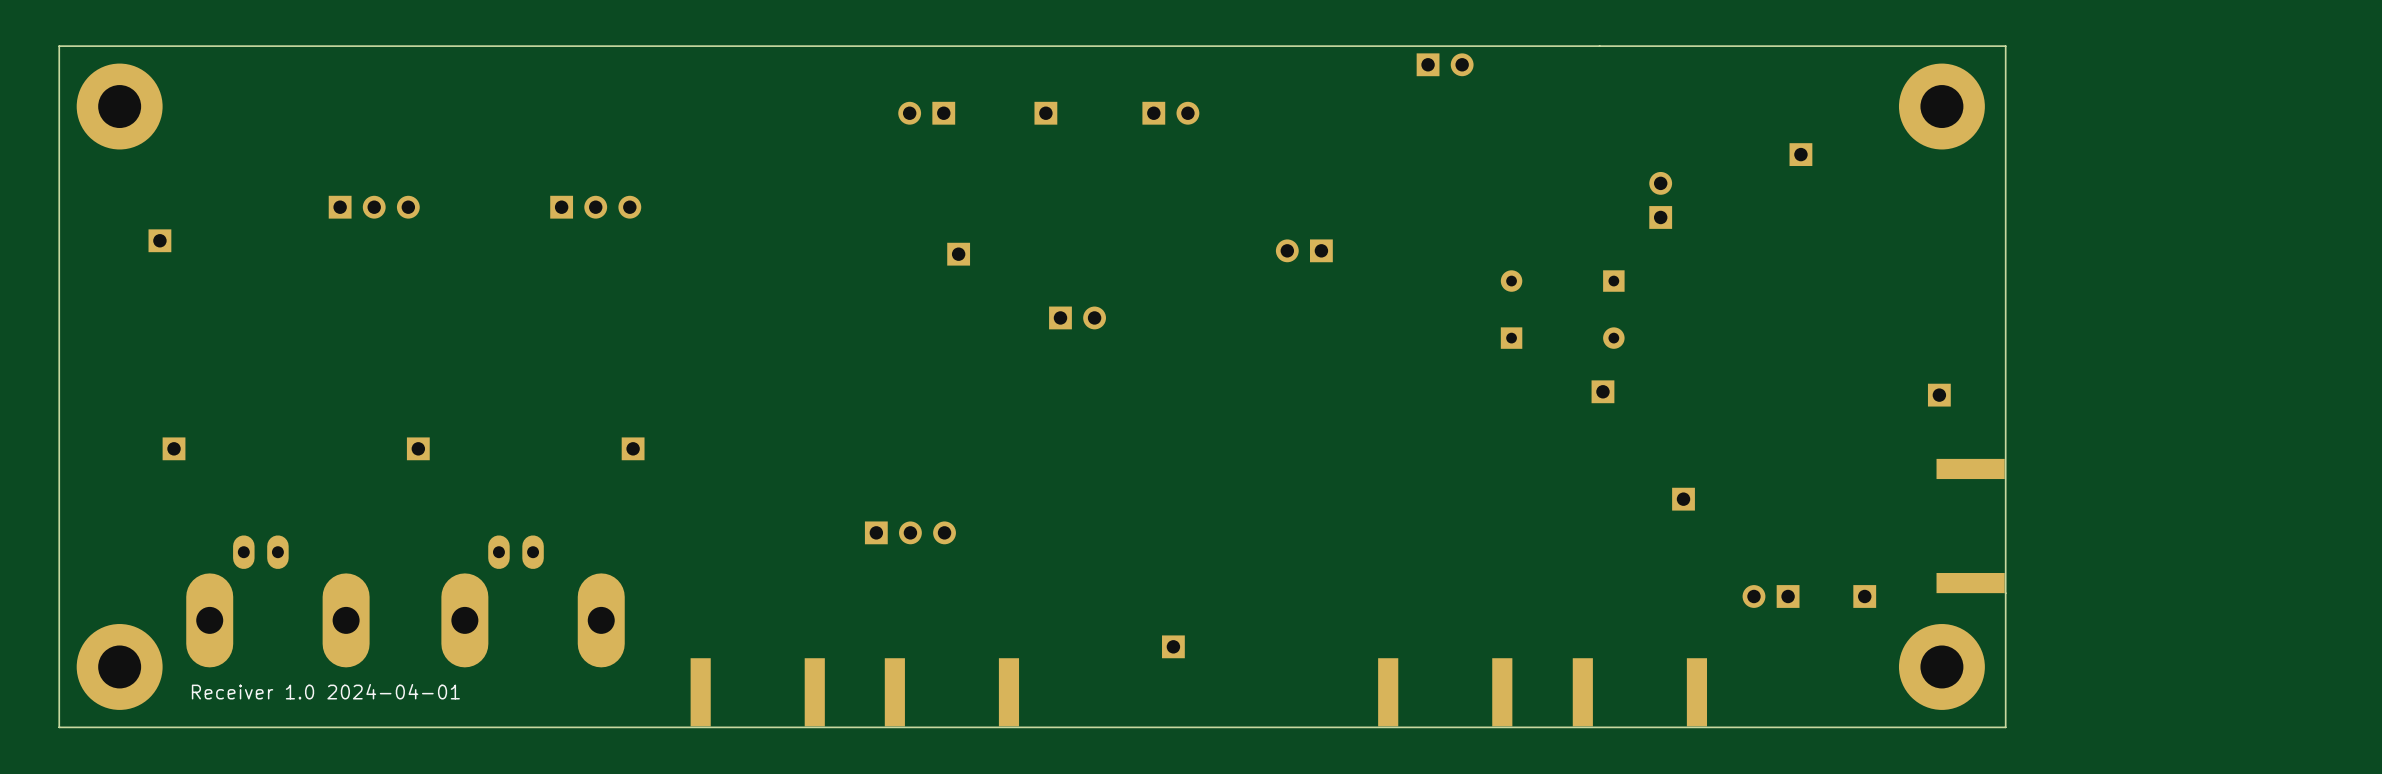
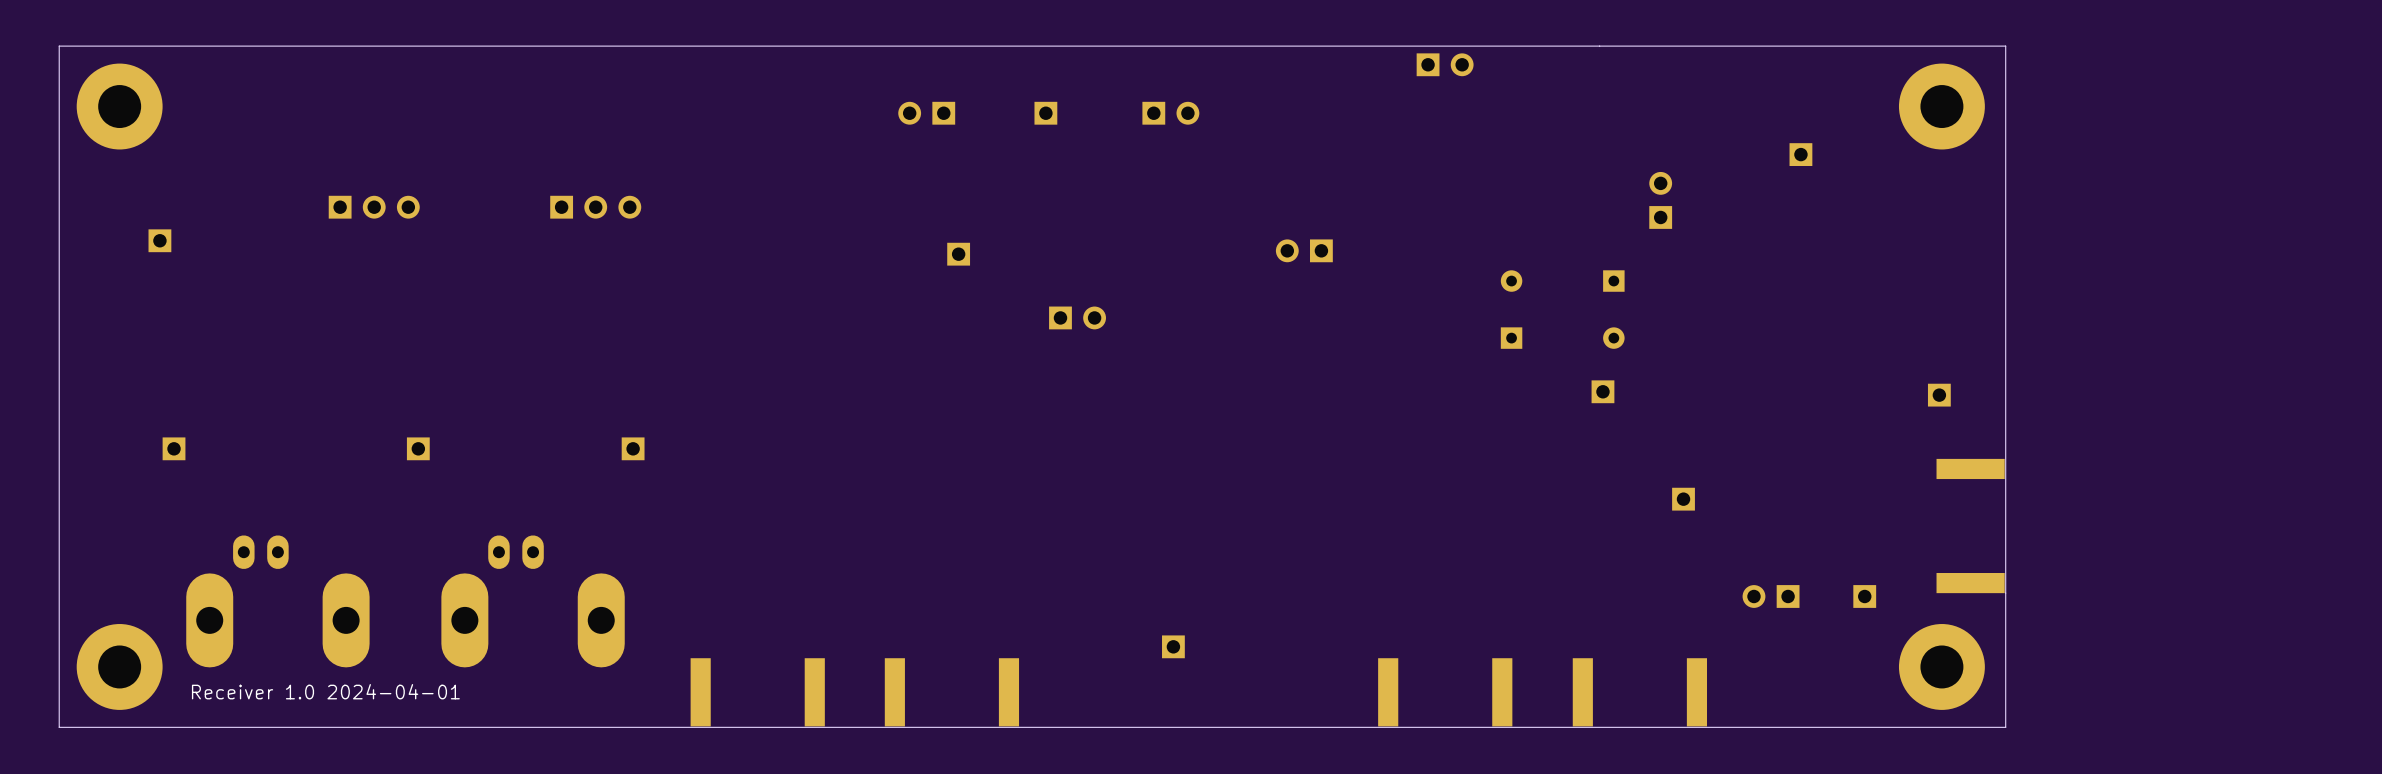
part: (910, 532) -> none

